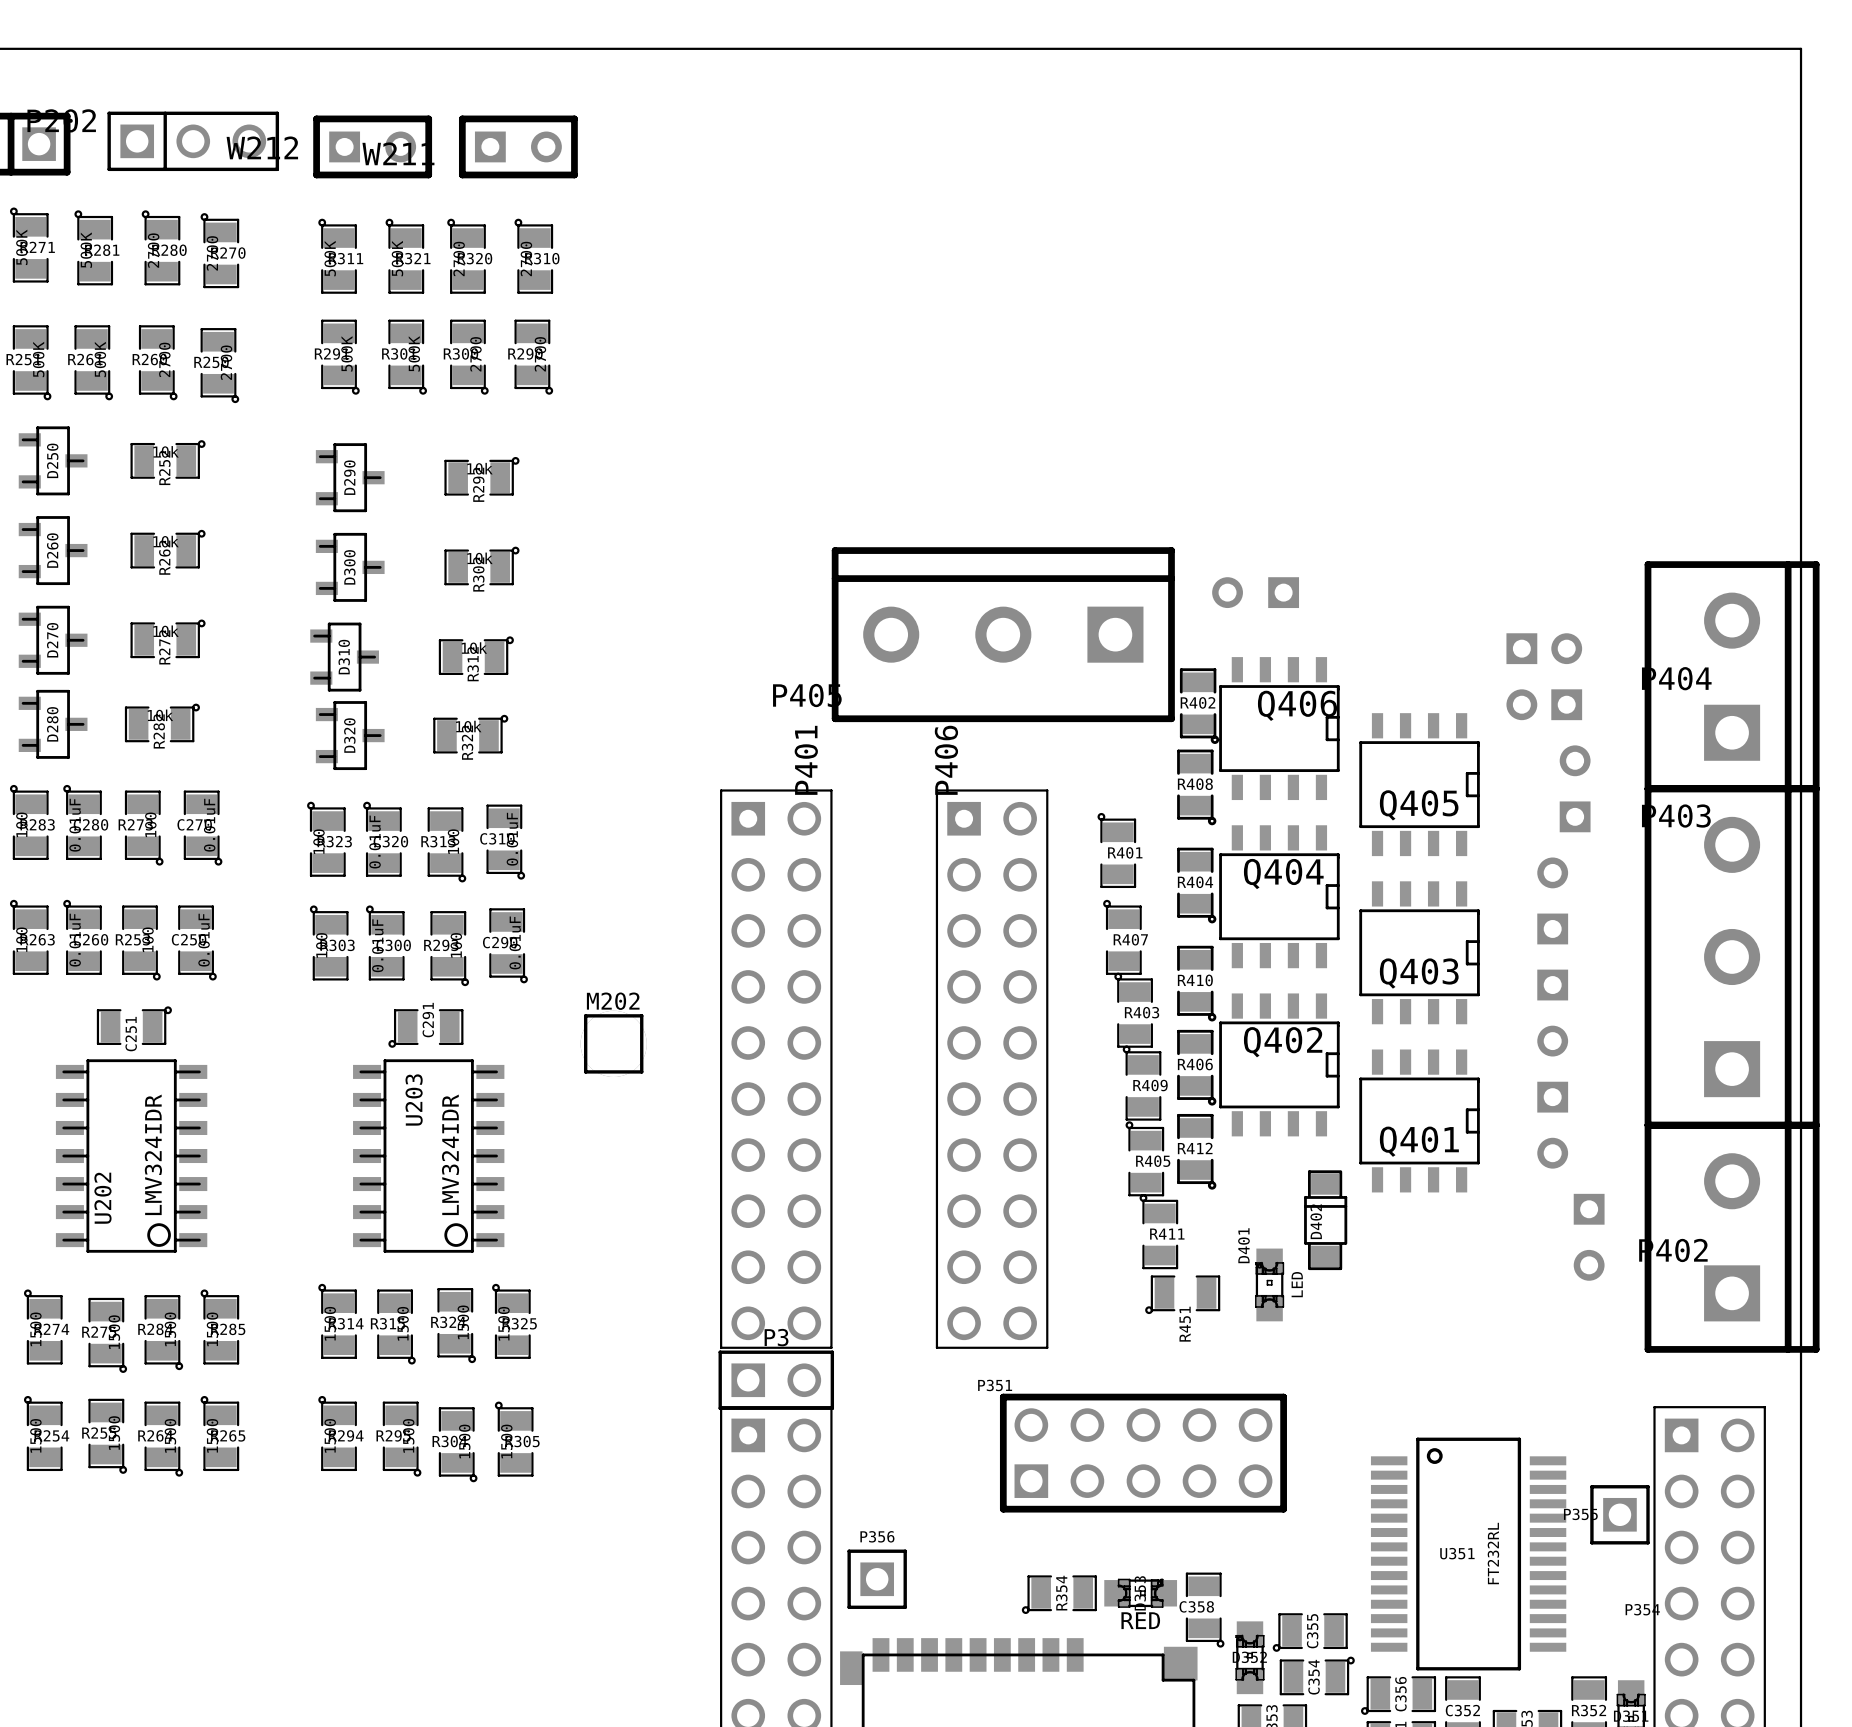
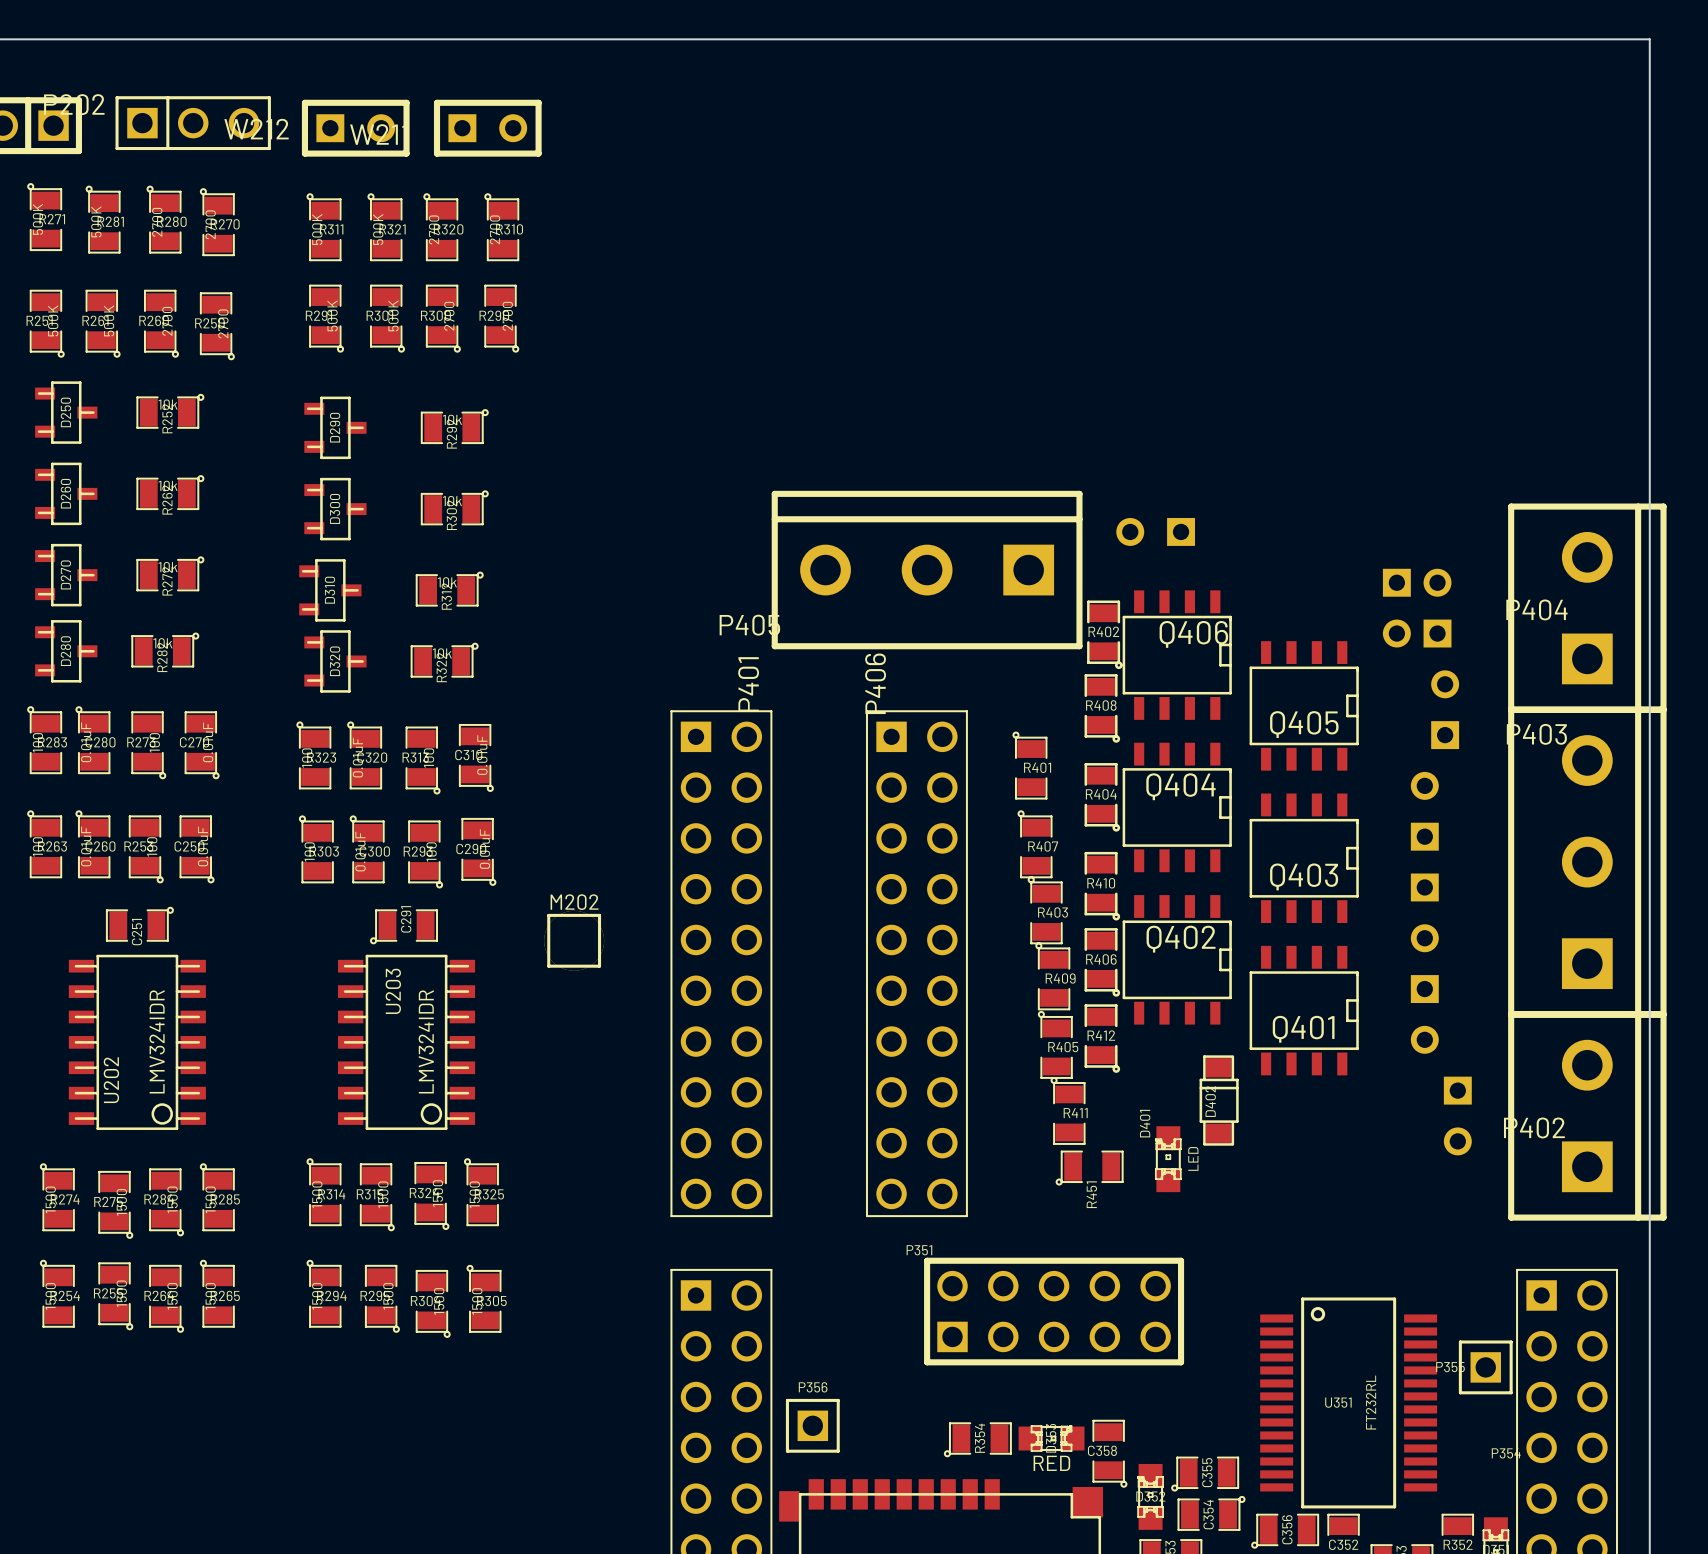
P3: (776, 1380) -> none

